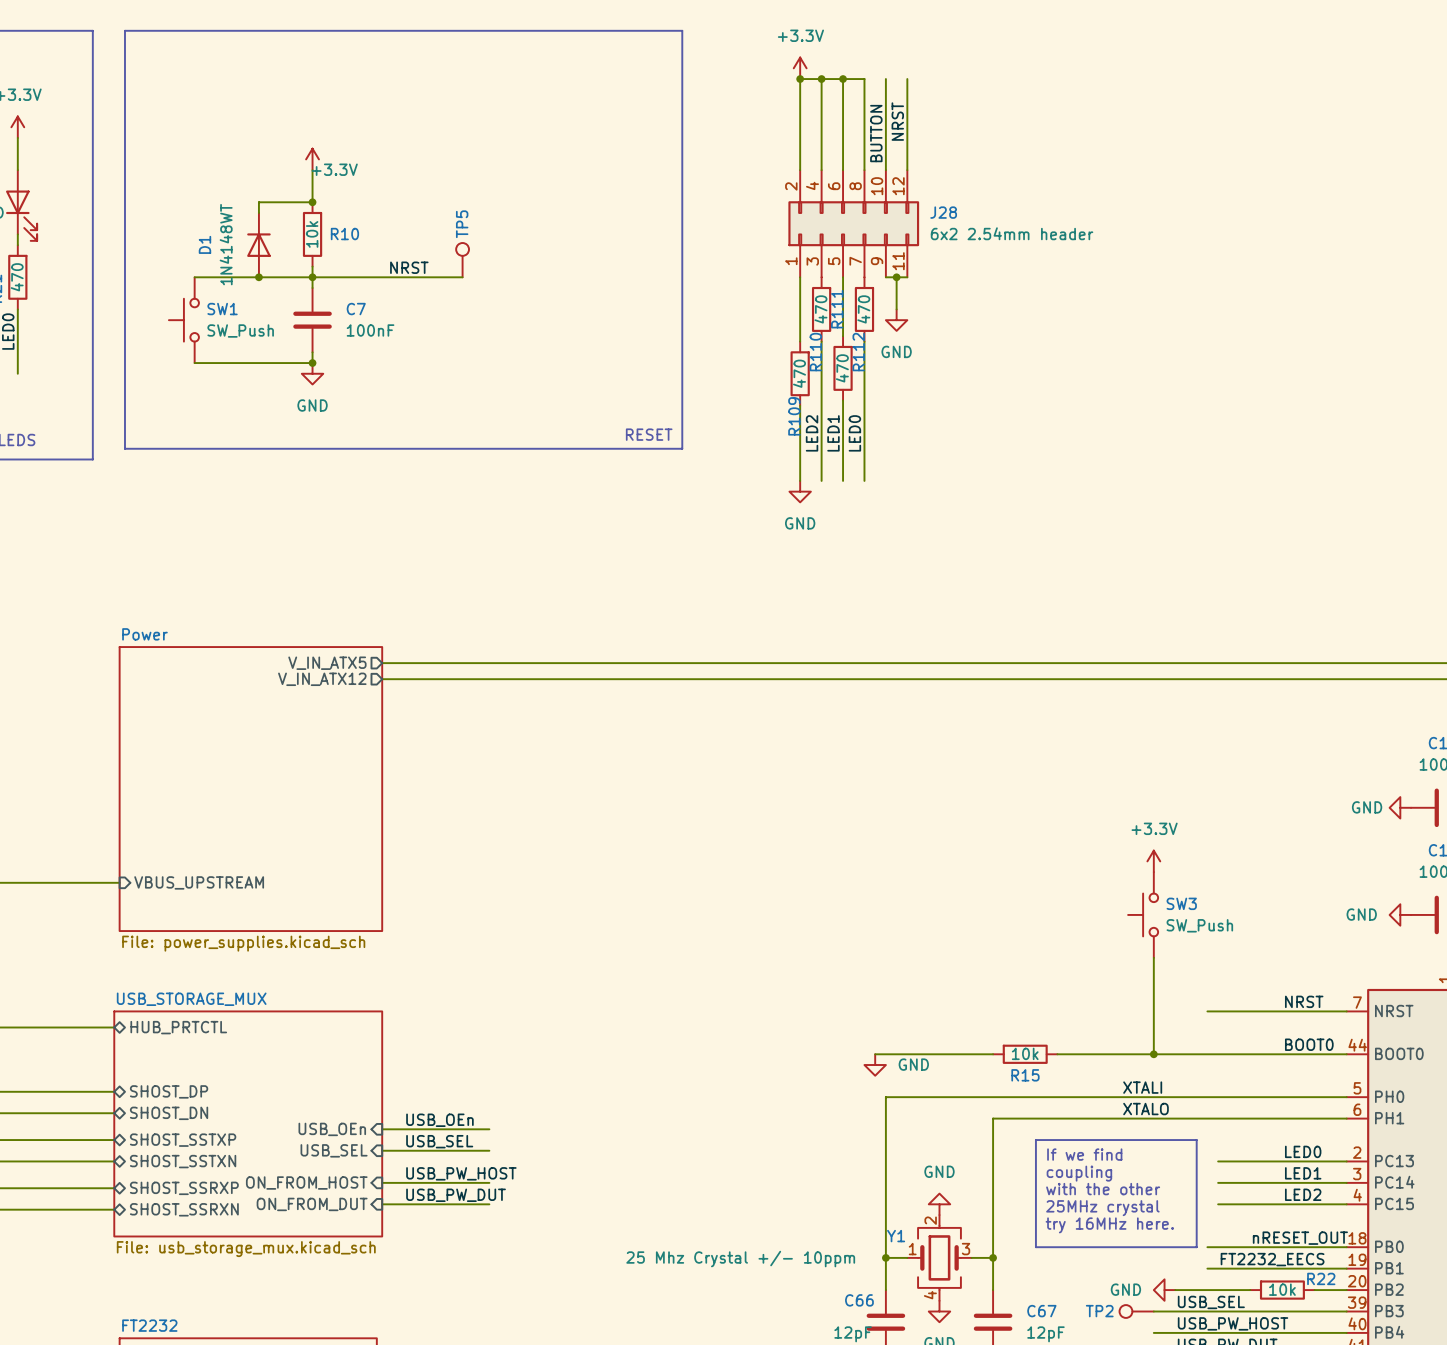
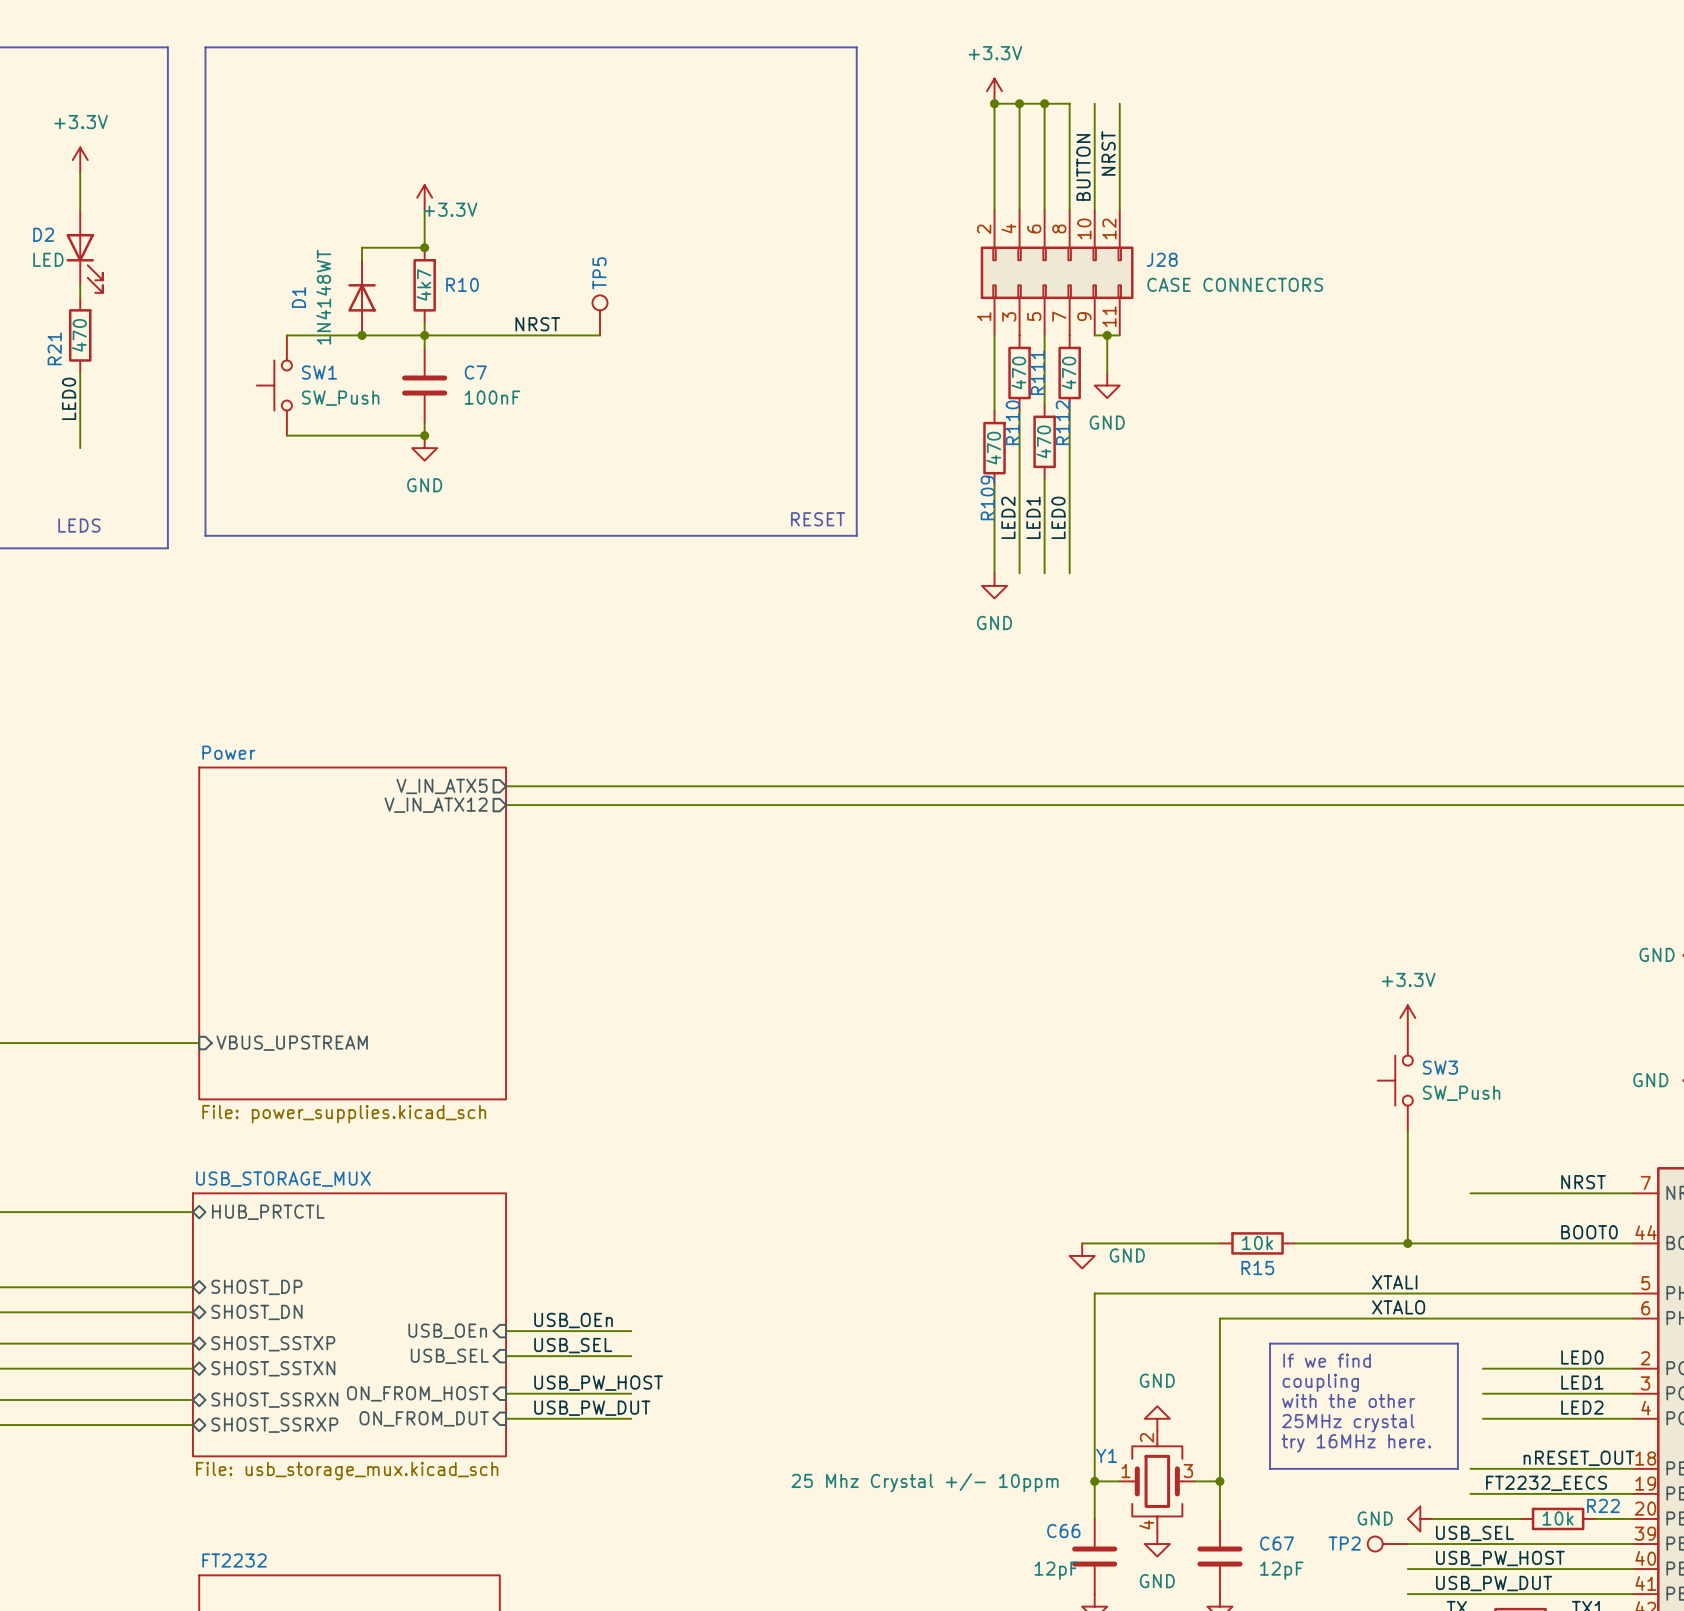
J28 value: 6x2 2.54mm header (1012, 233) -> CASE CONNECTORS (1235, 284)
R10 value: 10k (312, 234) -> 4k7 (423, 285)
sheet pin: SHOST_SSRXP (184, 1188) -> SHOST_SSRXN (274, 1400)
sheet pin: SHOST_SSRXN (184, 1209) -> SHOST_SSRXP (274, 1425)

